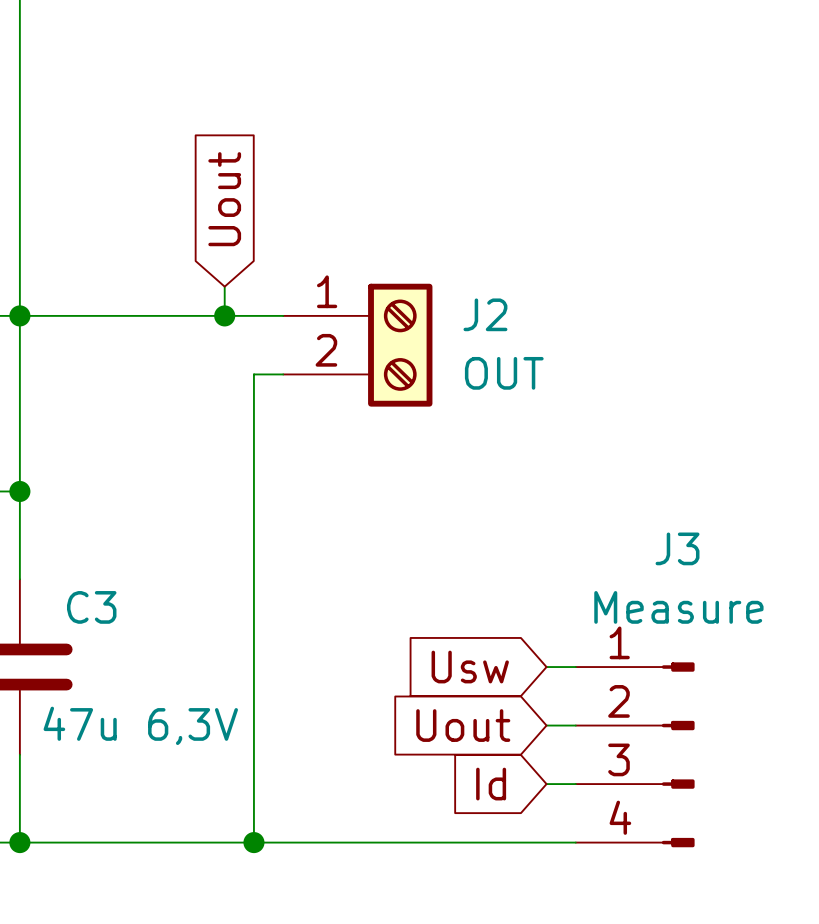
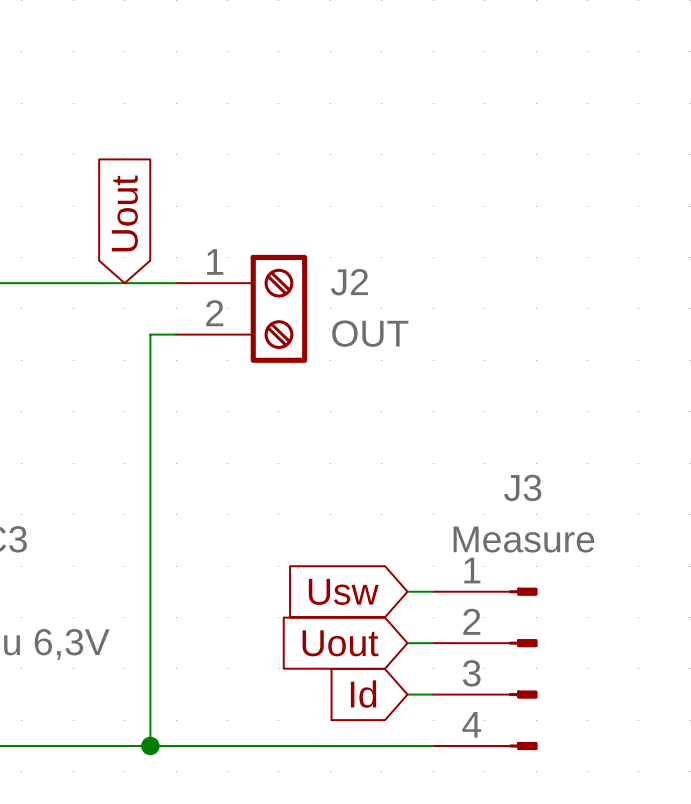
global label position: Uout (224, 199) -> Uout (124, 213)
wire: (224, 286) (224, 315) -> none
junction: (224, 315) -> none

